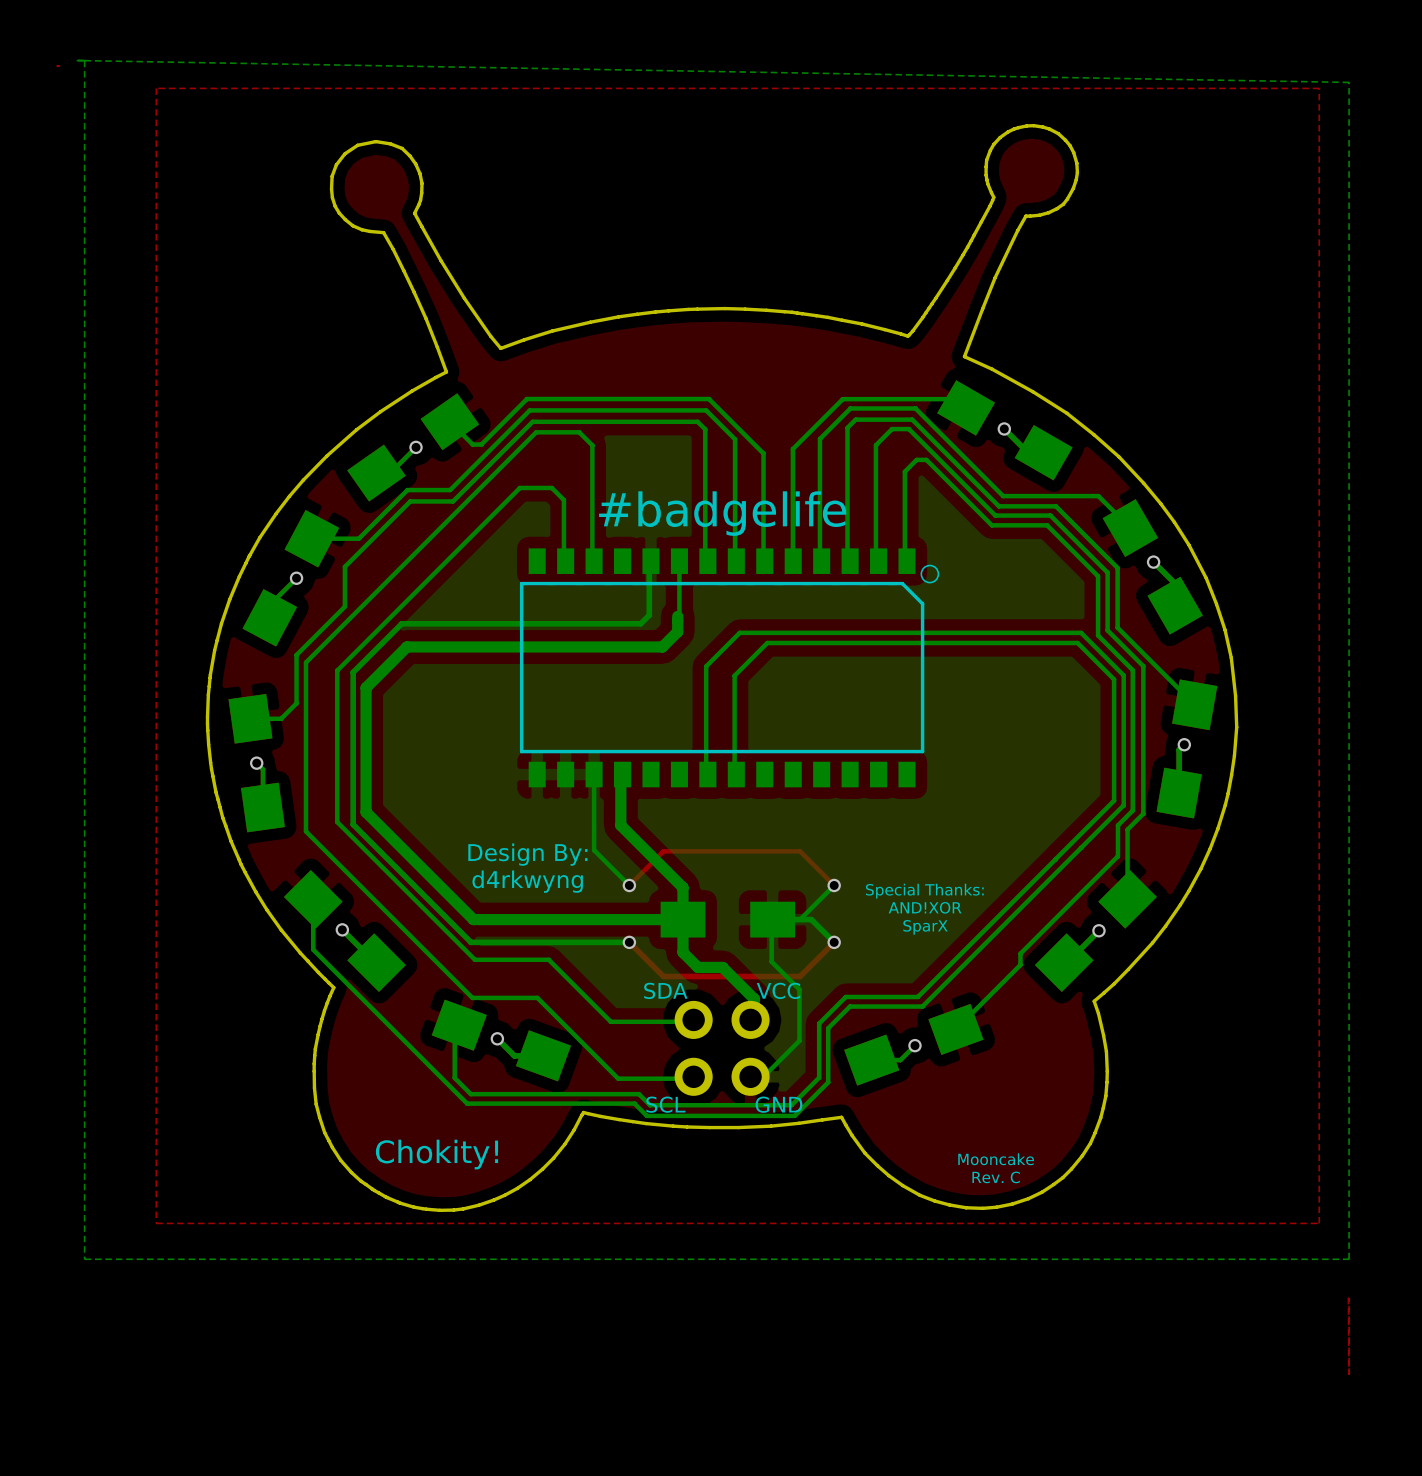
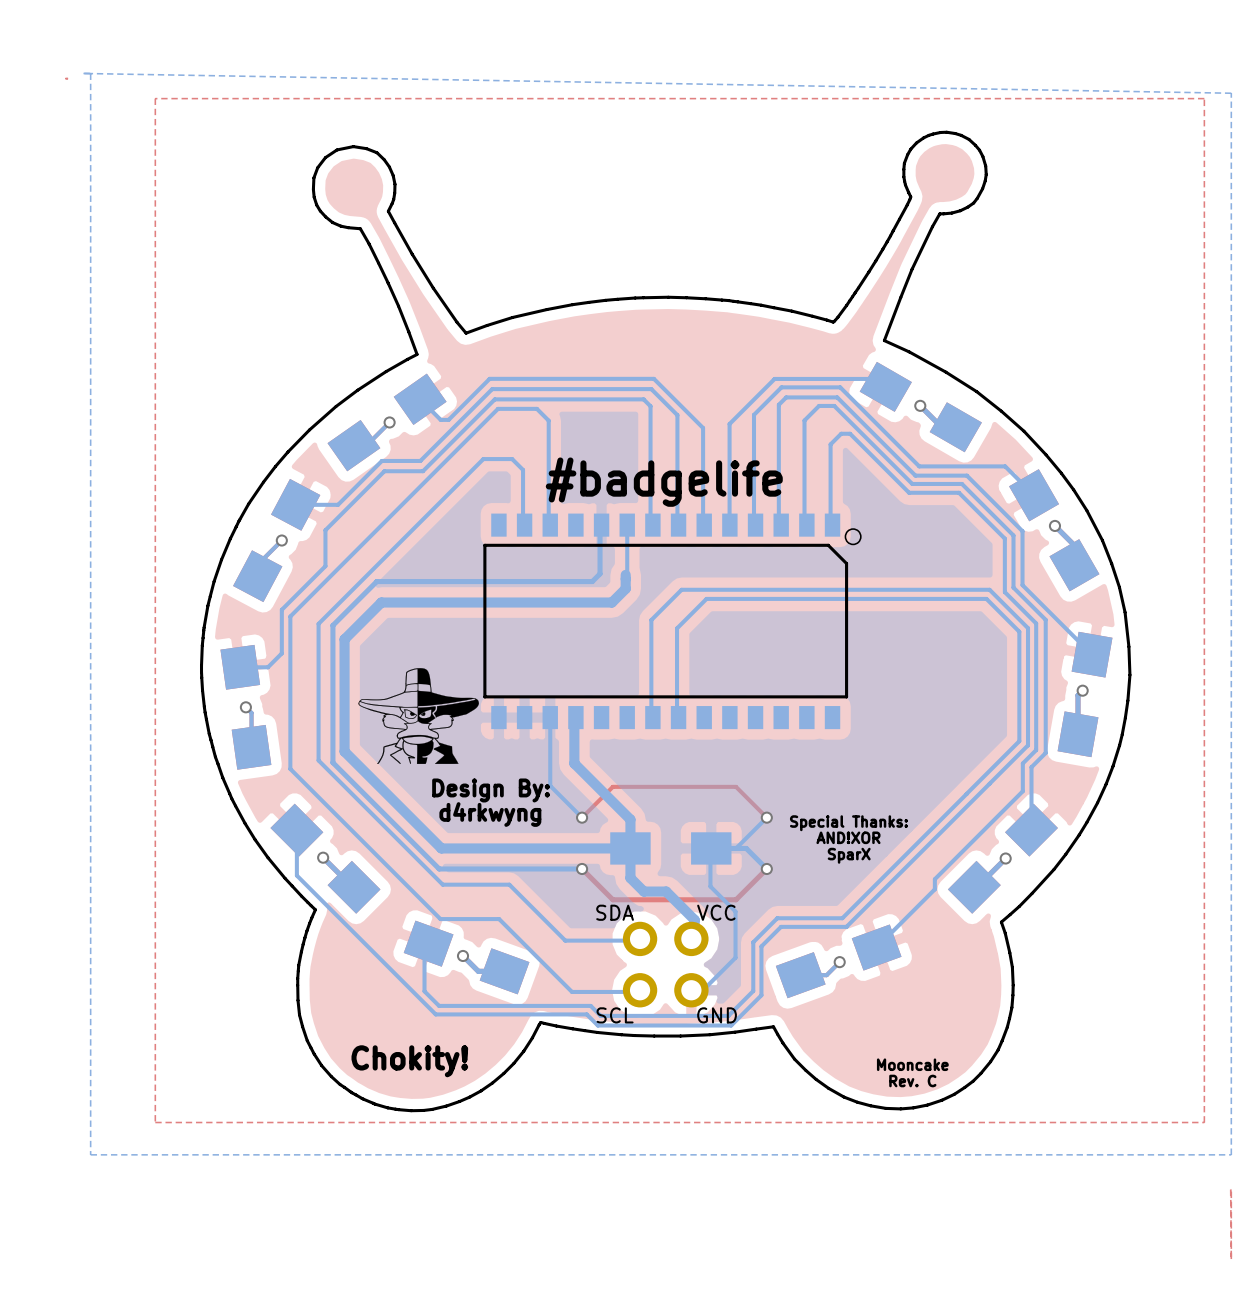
drawing: none -> [358, 668, 479, 765]

